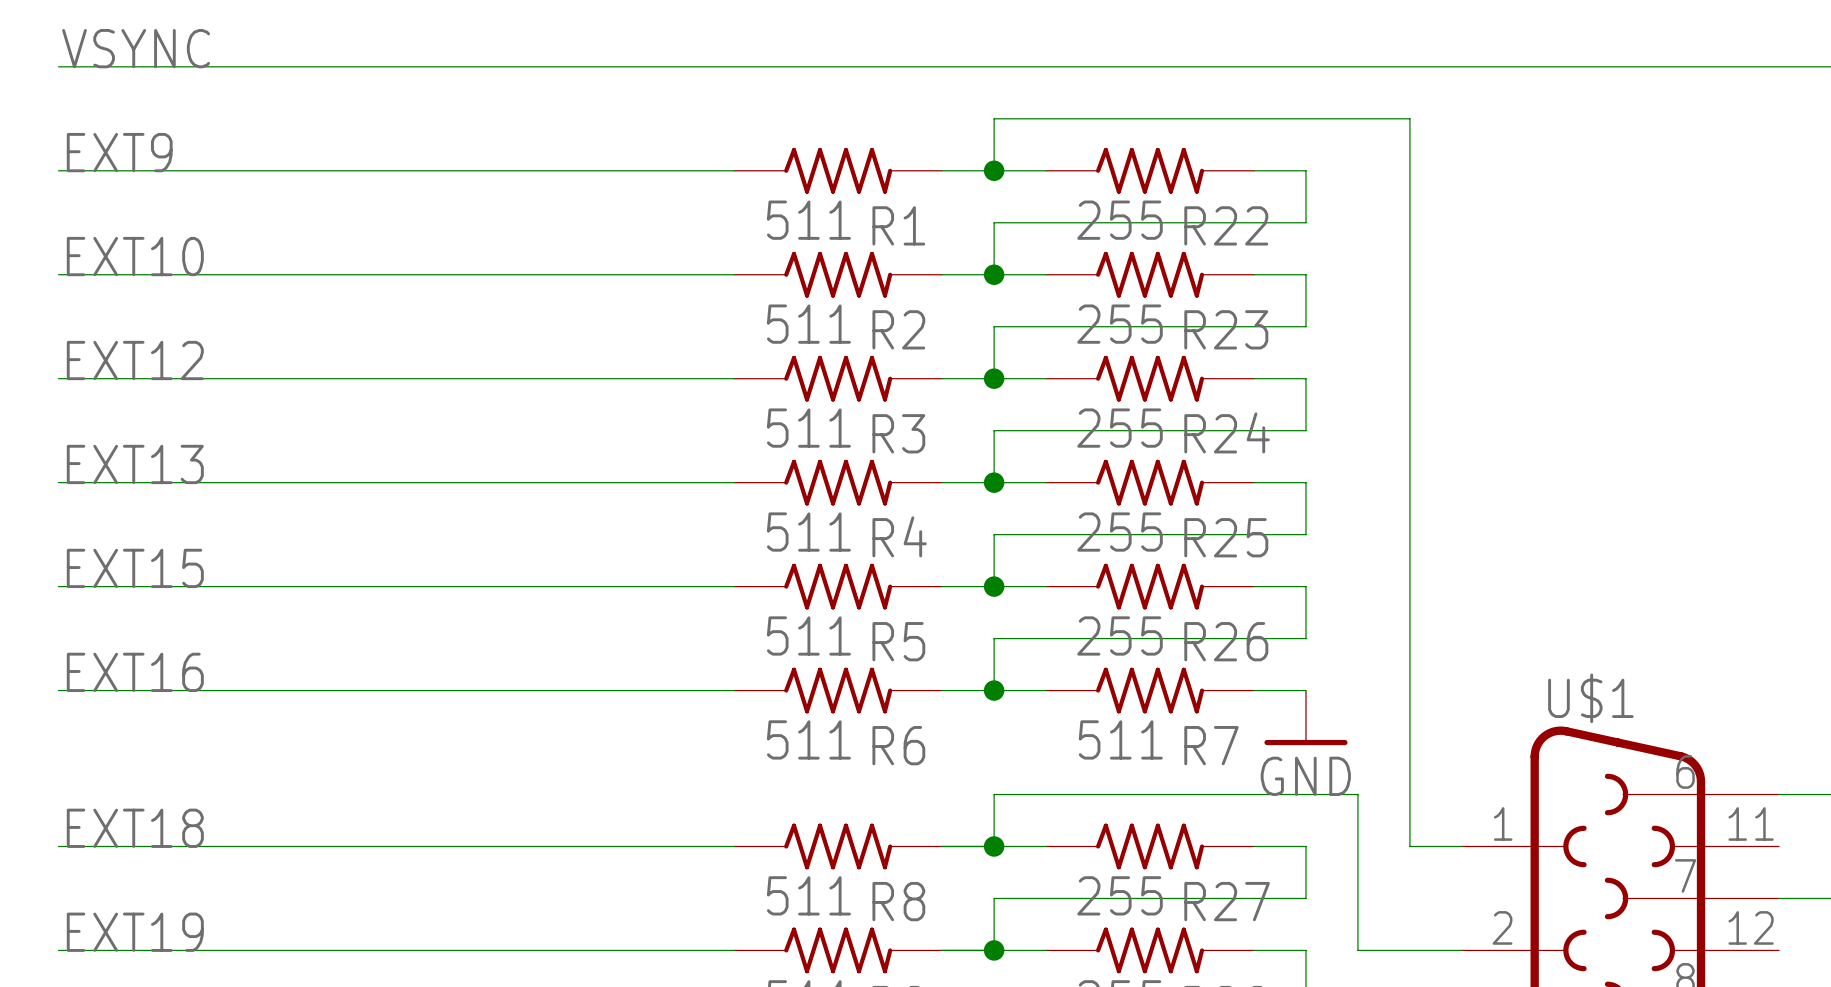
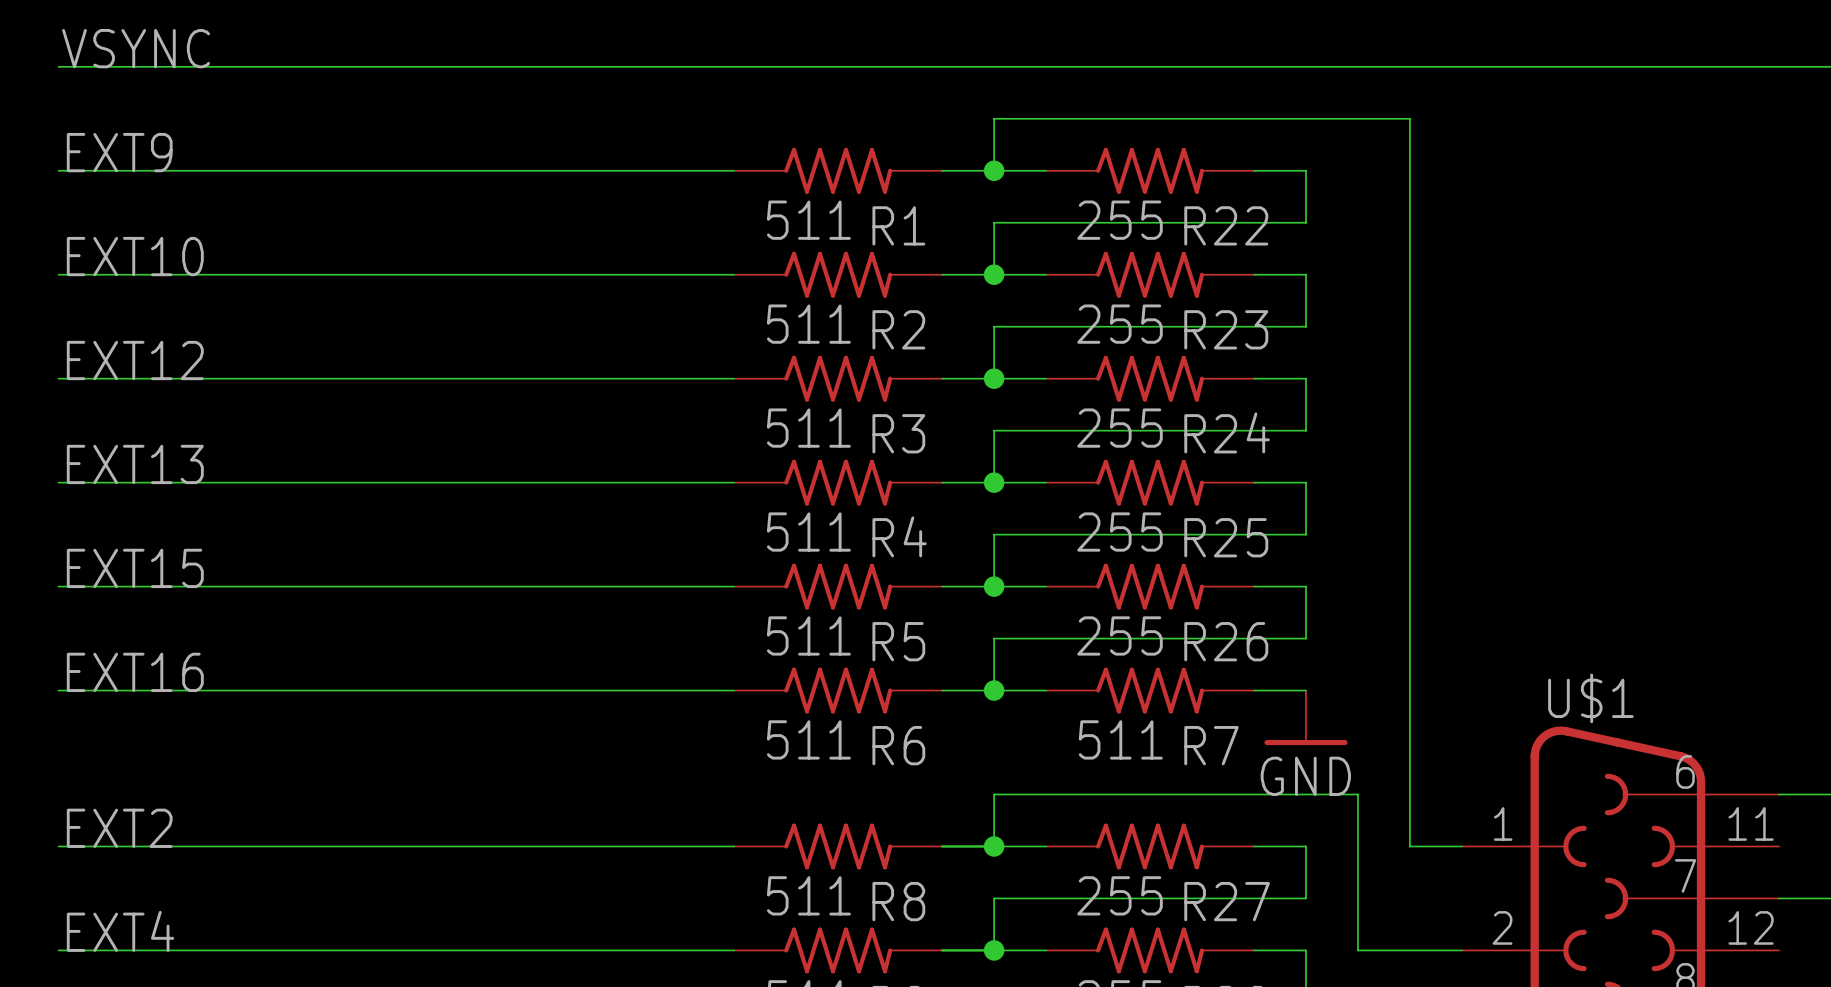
label: EXT18 (135, 828) -> EXT2 (119, 828)
label: EXT19 (135, 932) -> EXT4 (120, 931)

